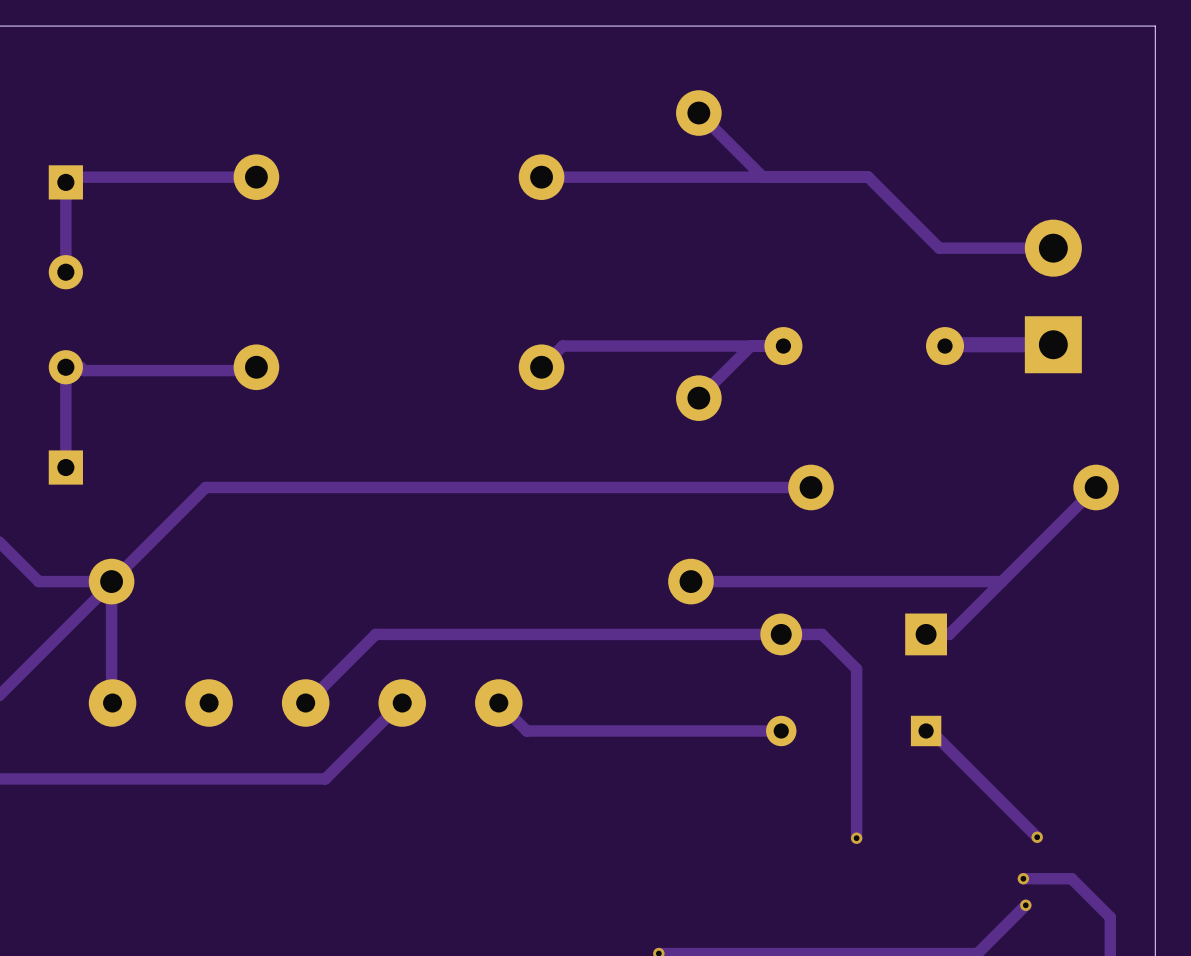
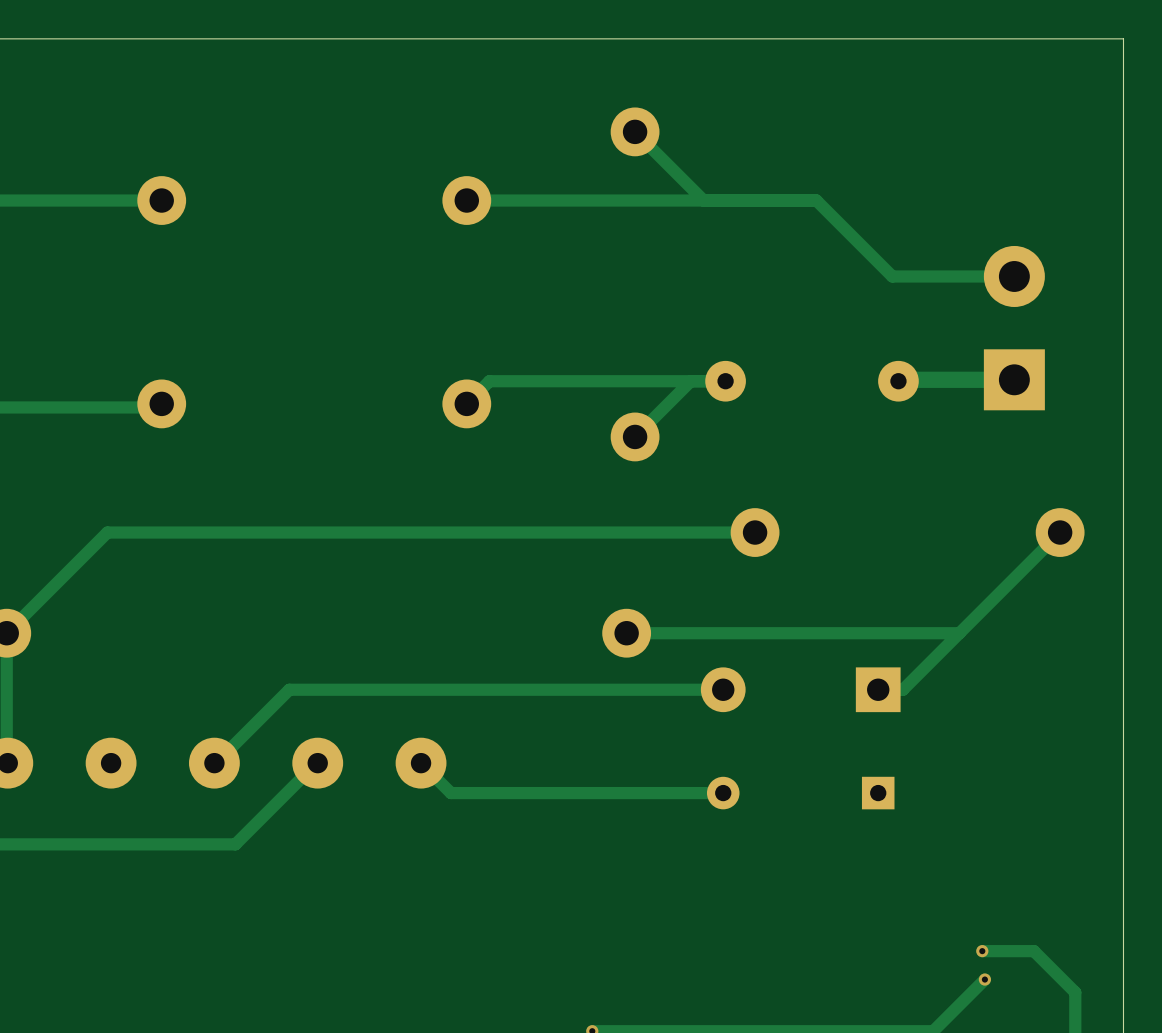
track: (781, 634) (822, 634) (856, 669) (856, 838) -> none
track: (926, 730) (930, 730) (1037, 837) -> none
via: (1037, 837) -> none
via: (856, 838) -> none

